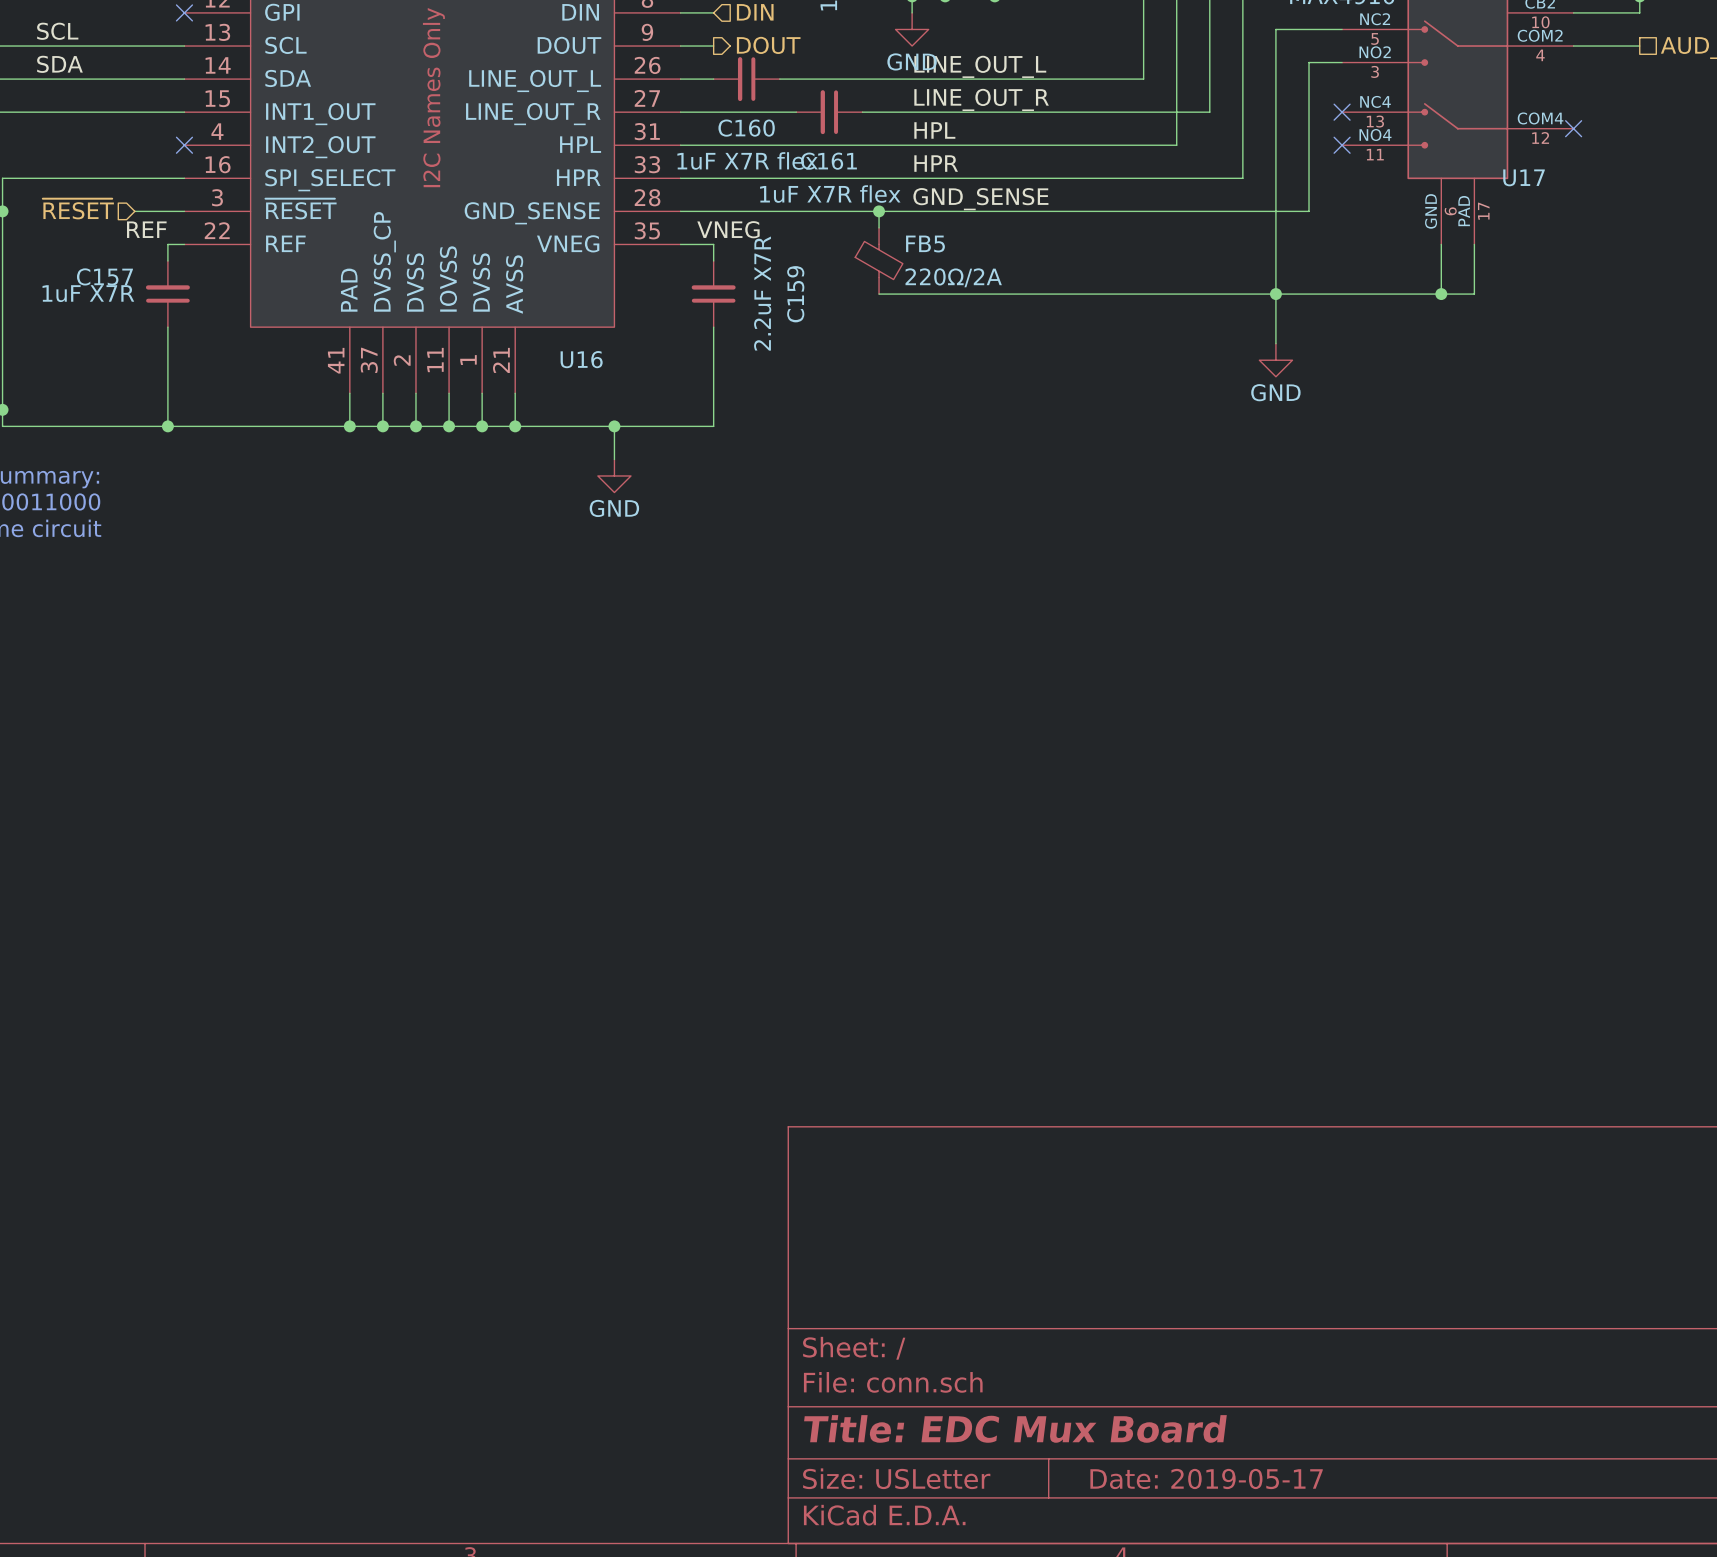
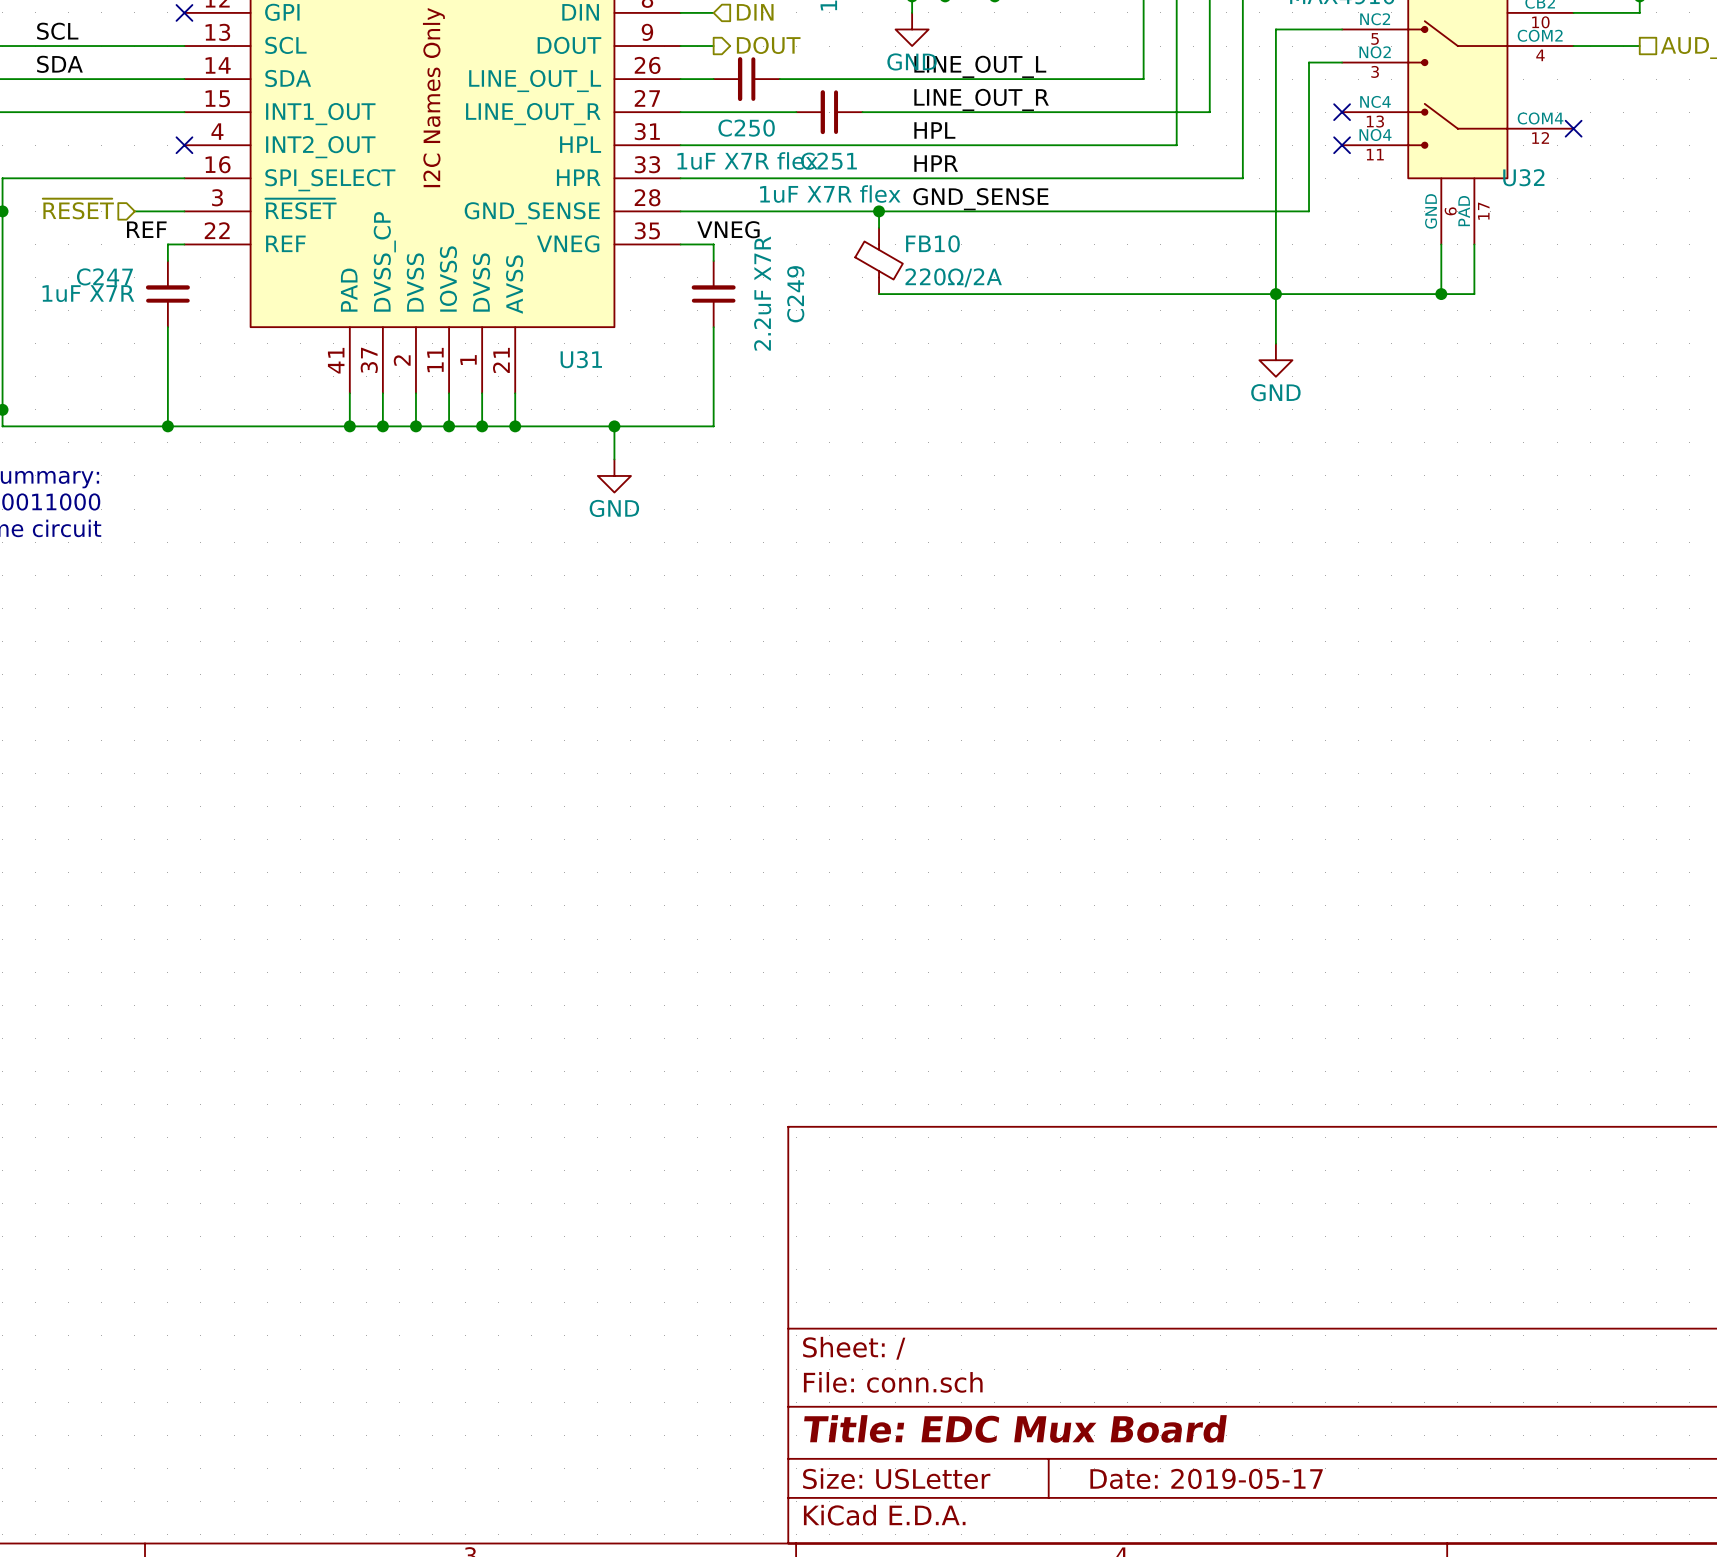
C160 name: C160 (746, 128) -> C250 (746, 128)
C161 name: C161 (829, 161) -> C251 (829, 161)
U17 name: U17 (1524, 177) -> U32 (1523, 177)
FB5 name: FB5 (925, 244) -> FB10 (932, 243)
C157 name: C157 (104, 276) -> C247 (104, 276)
C159 name: C159 (795, 294) -> C249 (795, 294)
U16 name: U16 (581, 359) -> U31 (581, 359)

